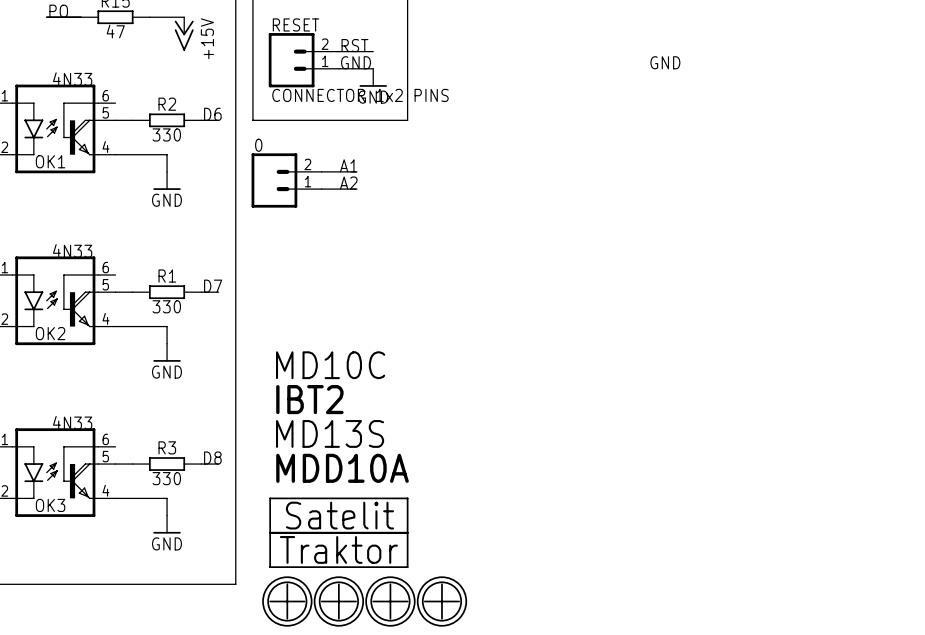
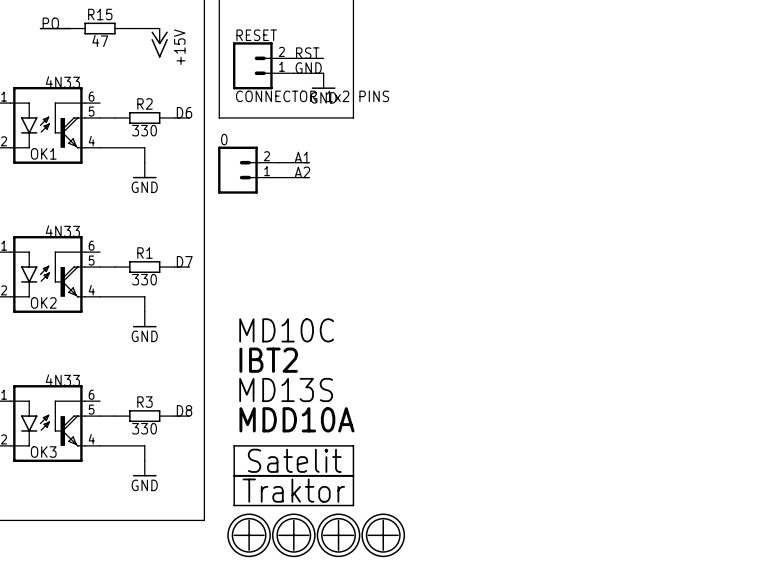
label: GND (665, 62) -> none

